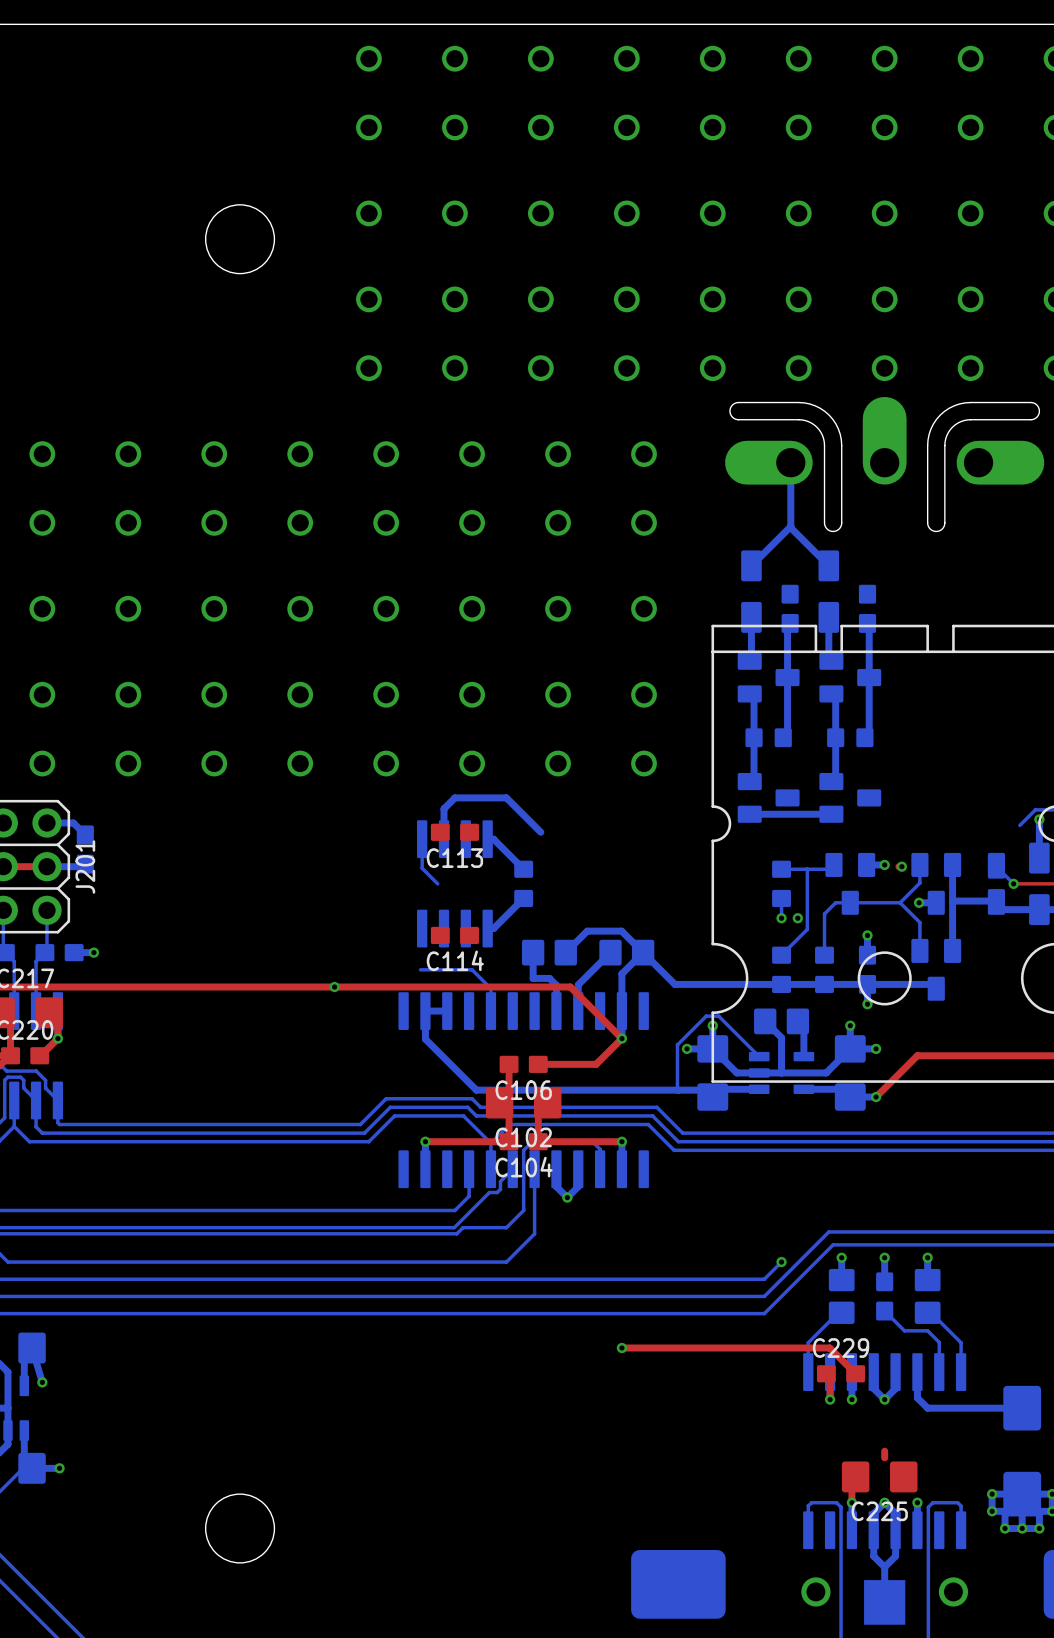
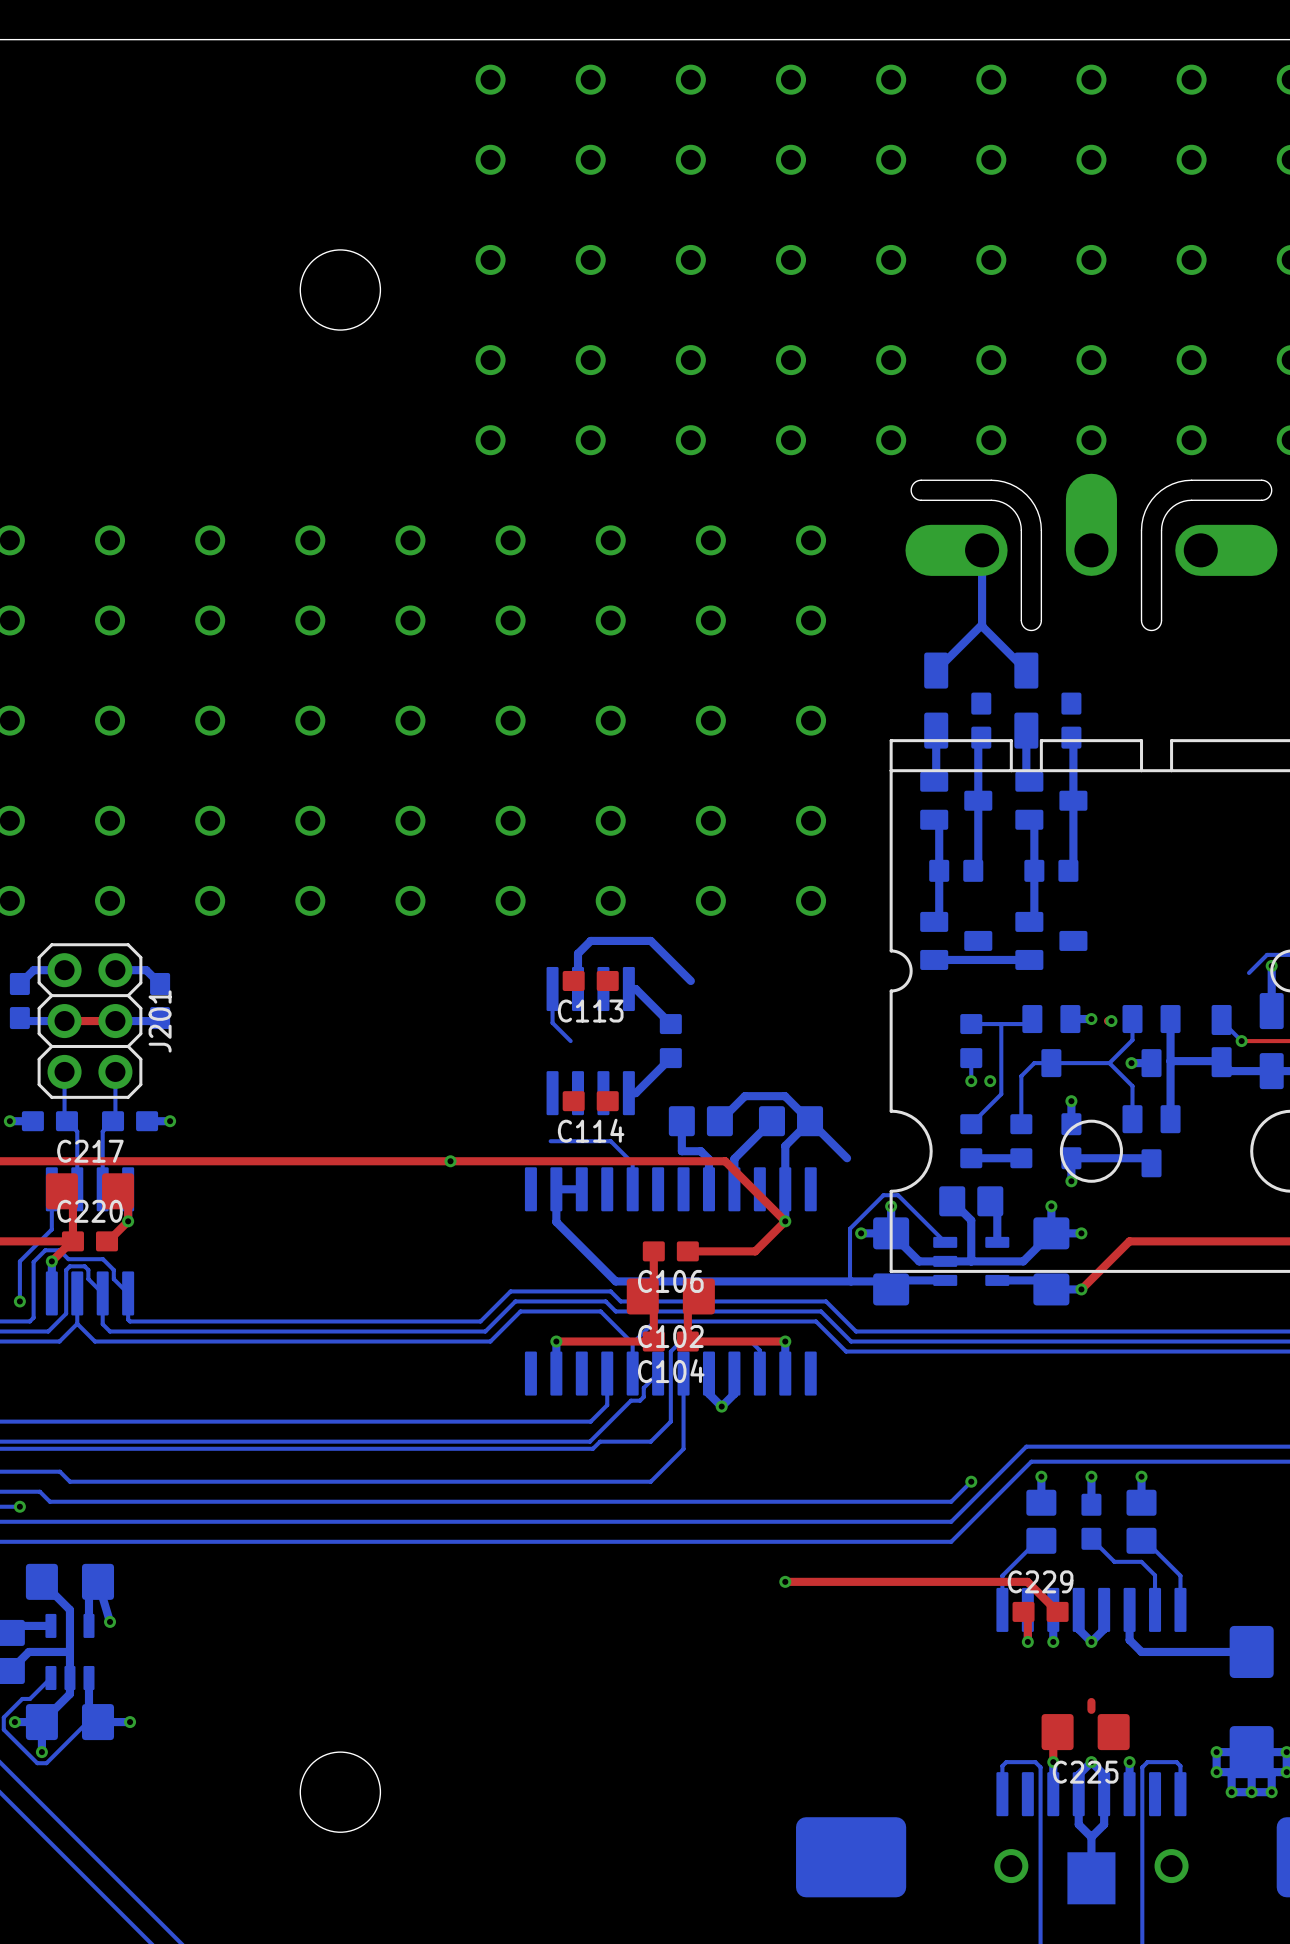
bottom track: (674, 984) (781, 984) -> none
bottom track: (824, 984) (867, 984) -> none

